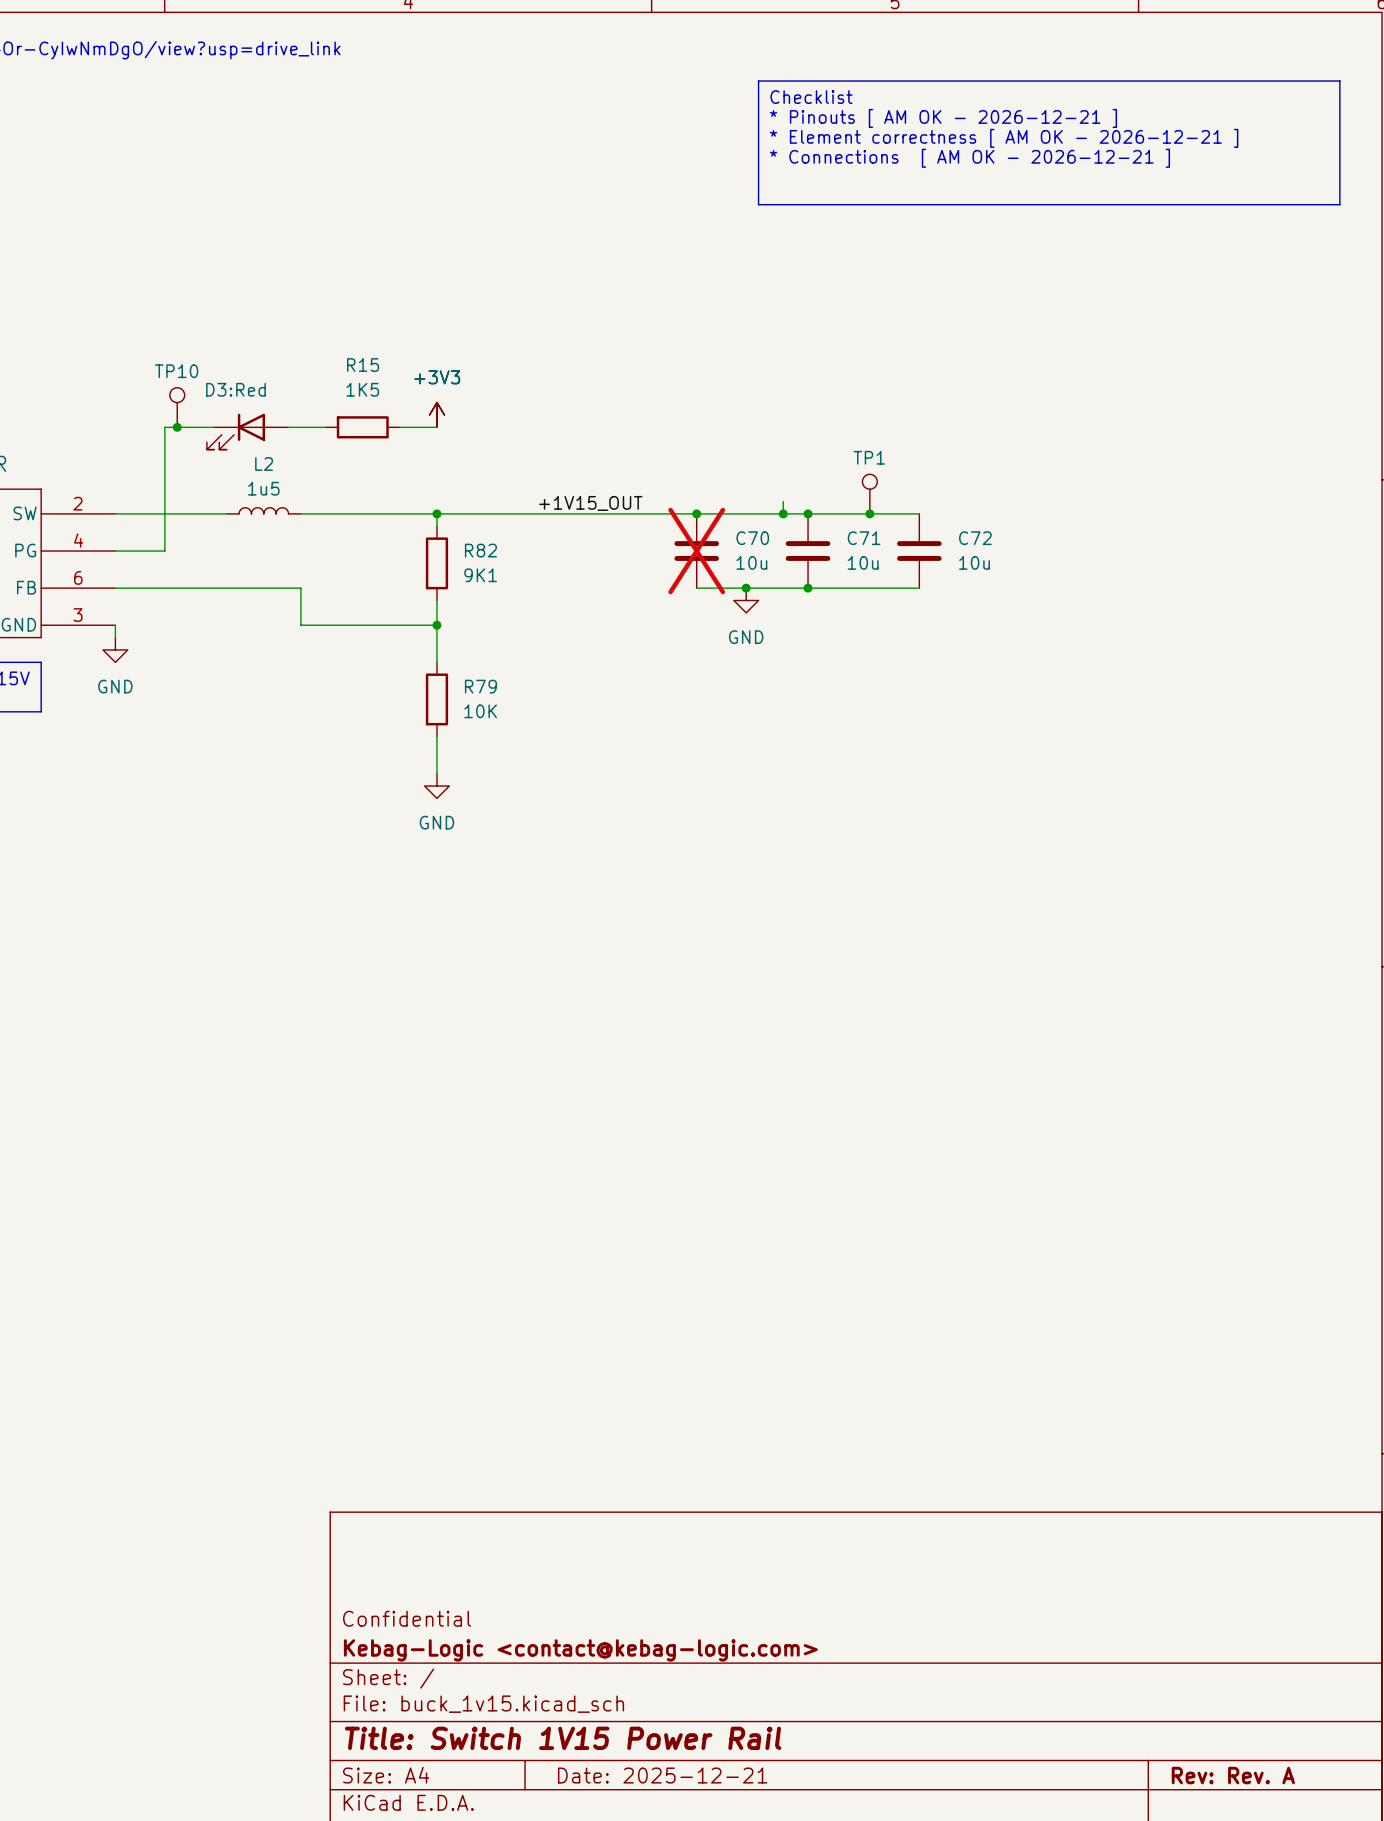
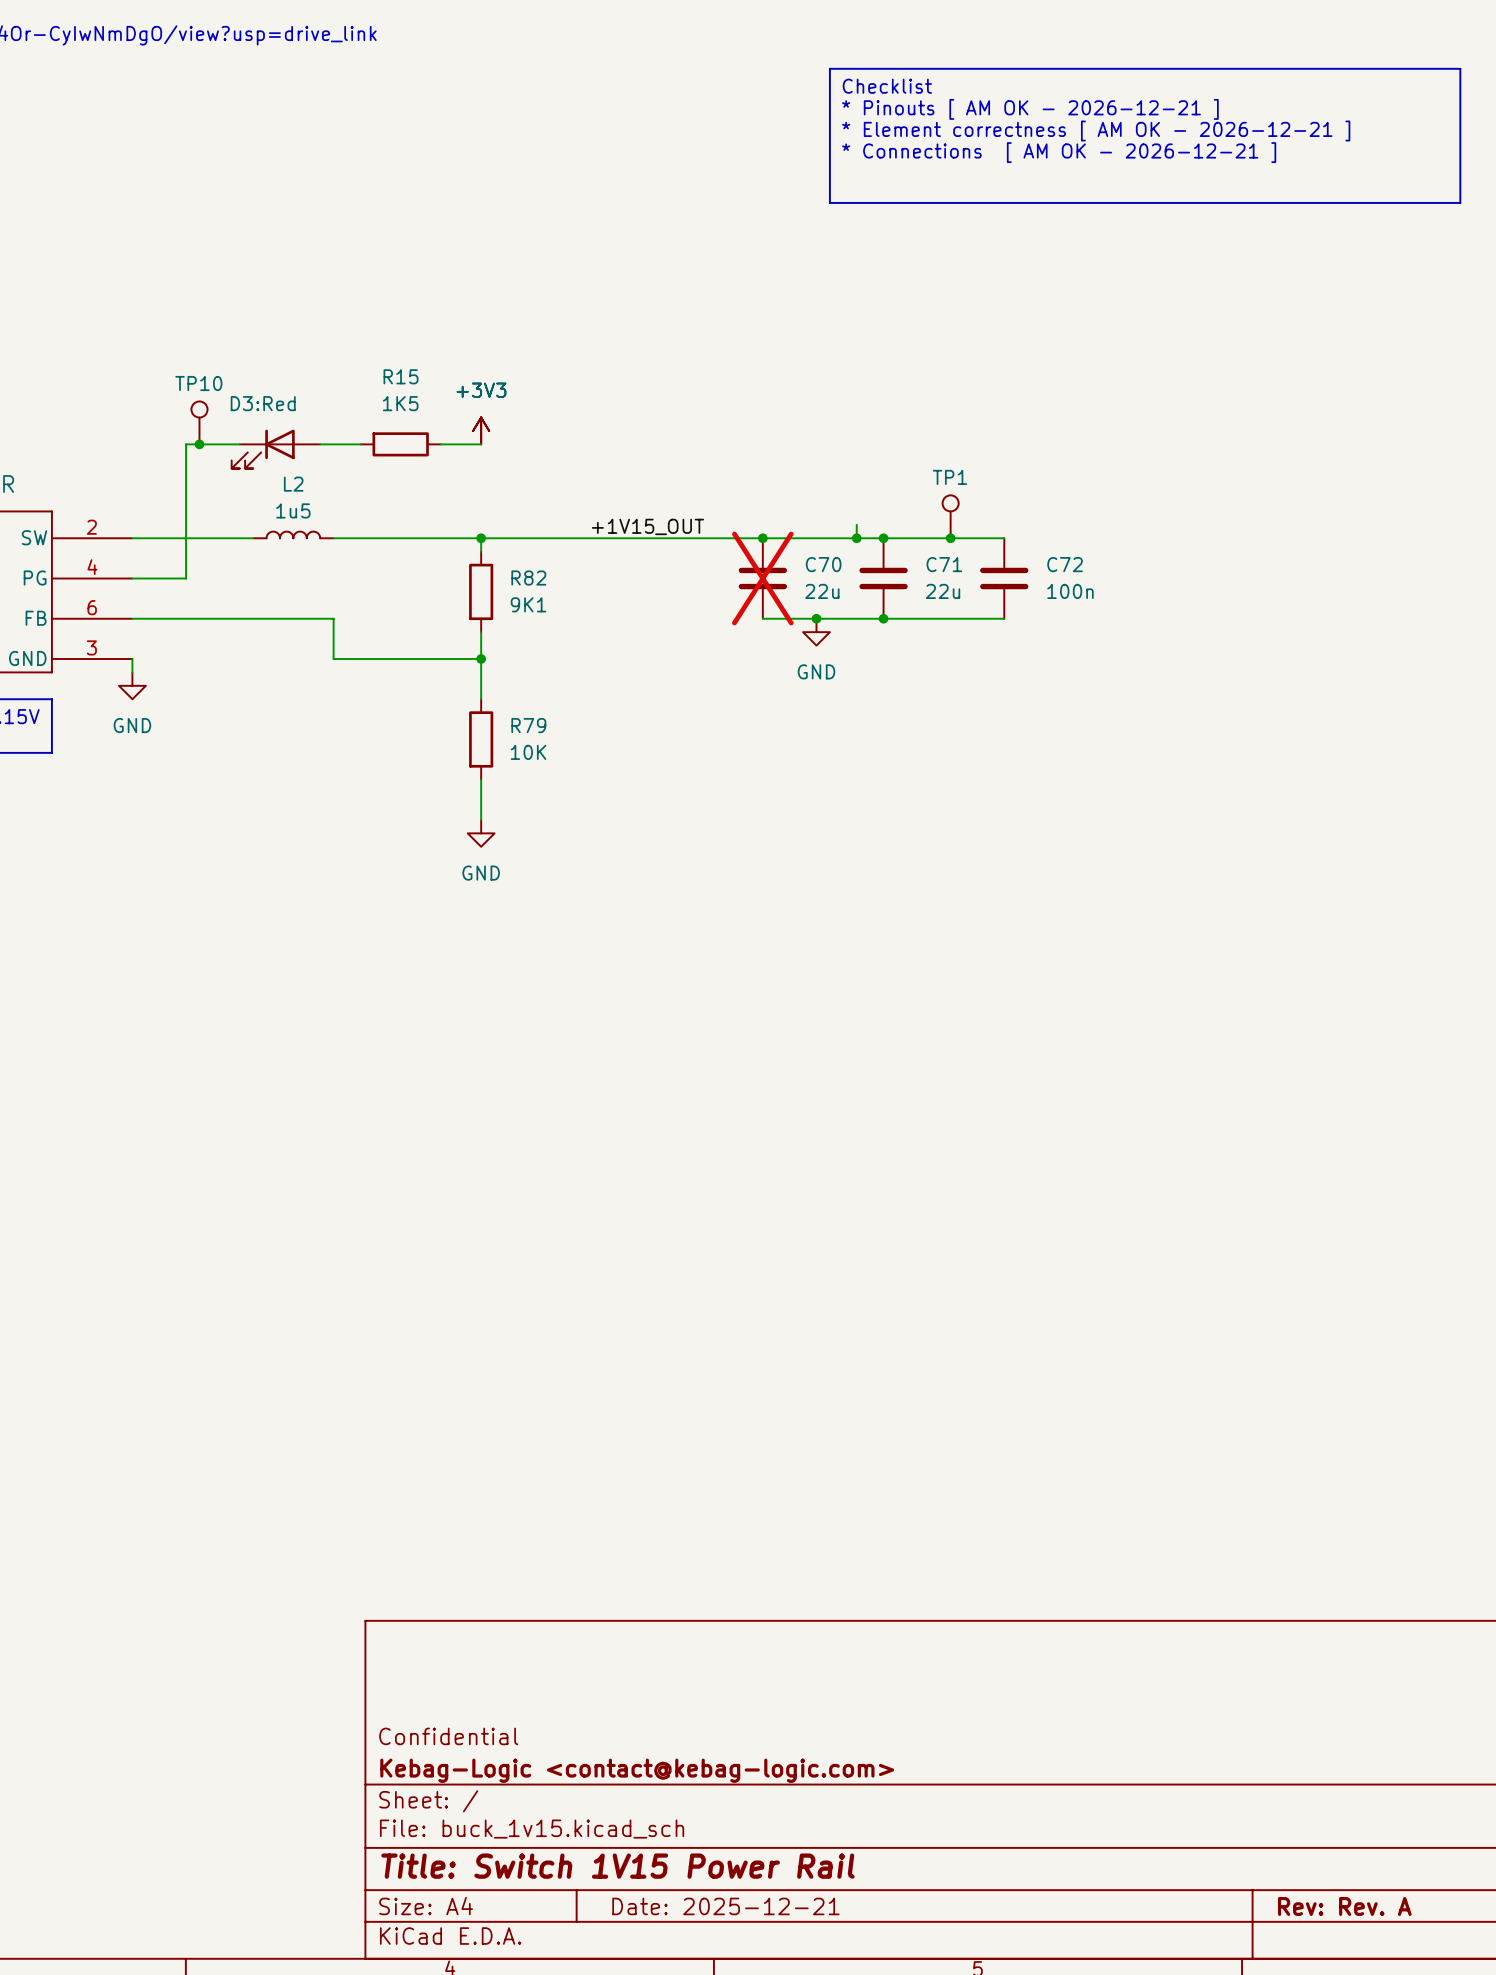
C70 value: 10u (751, 562) -> 22u (822, 591)
C71 value: 10u (863, 562) -> 22u (943, 591)
C72 value: 10u (974, 562) -> 100n (1070, 591)

